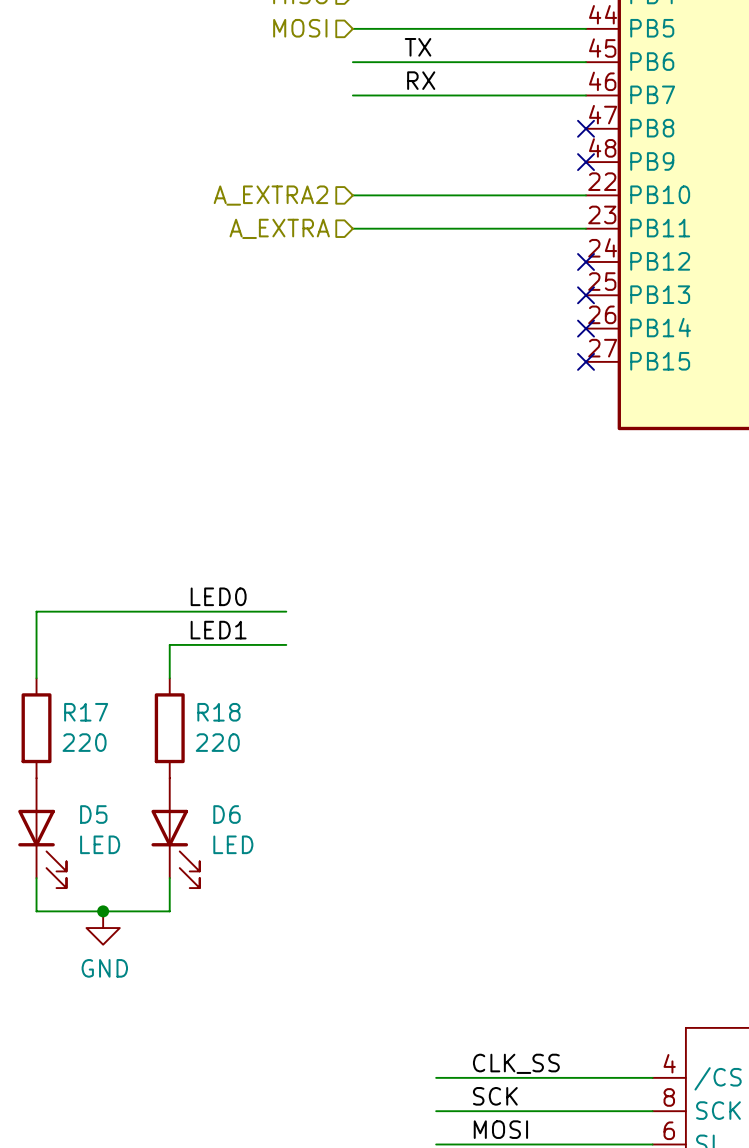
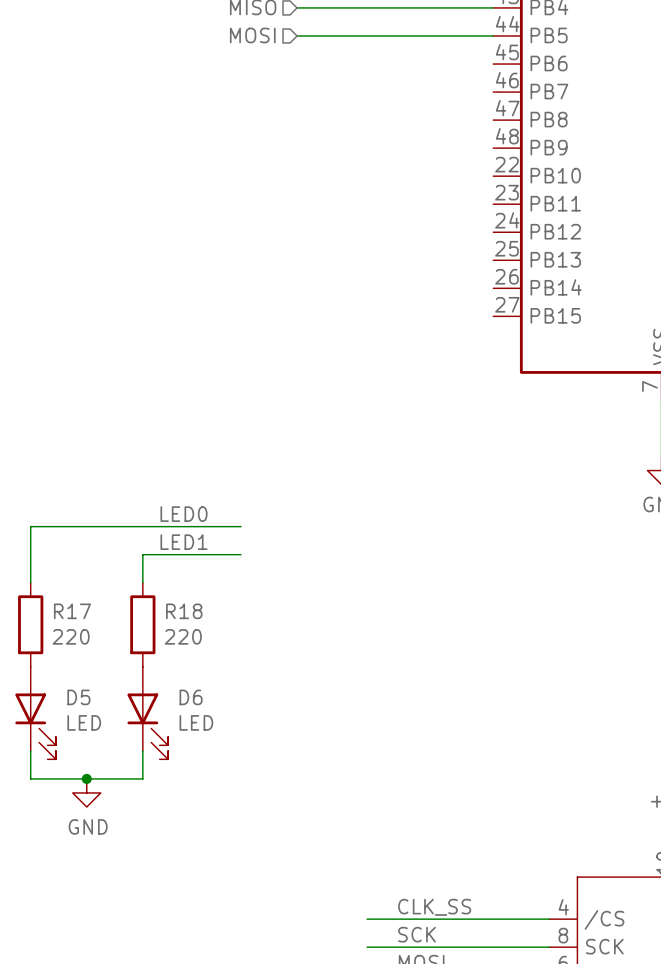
label: TX (418, 47) -> none
wire: (352, 62) (586, 62) -> none
label: RX (421, 80) -> none
wire: (352, 95) (586, 95) -> none
no-connect mark: (586, 128) -> none
no-connect mark: (586, 162) -> none
hierarchical label: A_EXTRA2 (270, 195) -> none
wire: (352, 195) (586, 195) -> none
hierarchical label: A_EXTRA (279, 228) -> none
wire: (352, 228) (586, 228) -> none
no-connect mark: (586, 261) -> none
no-connect mark: (586, 295) -> none
no-connect mark: (586, 328) -> none
no-connect mark: (586, 361) -> none

